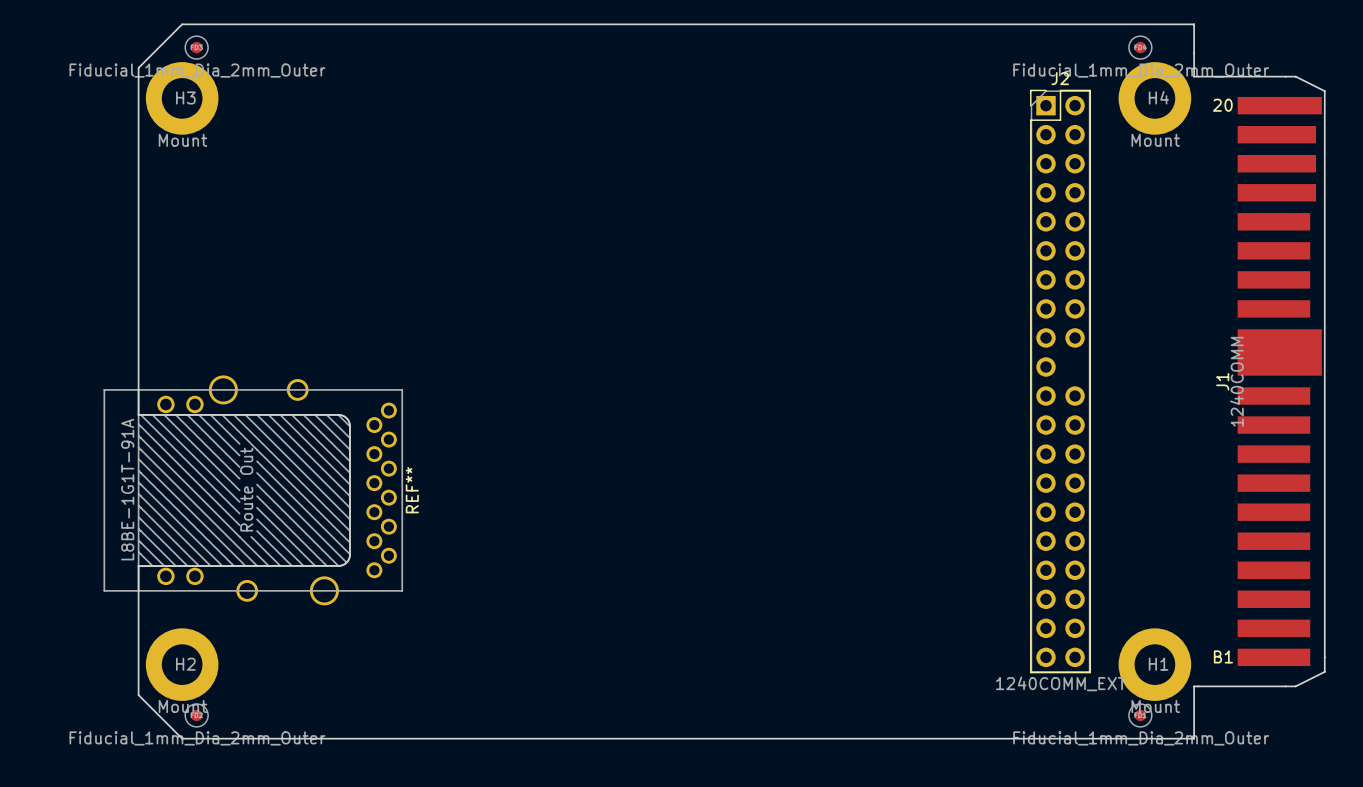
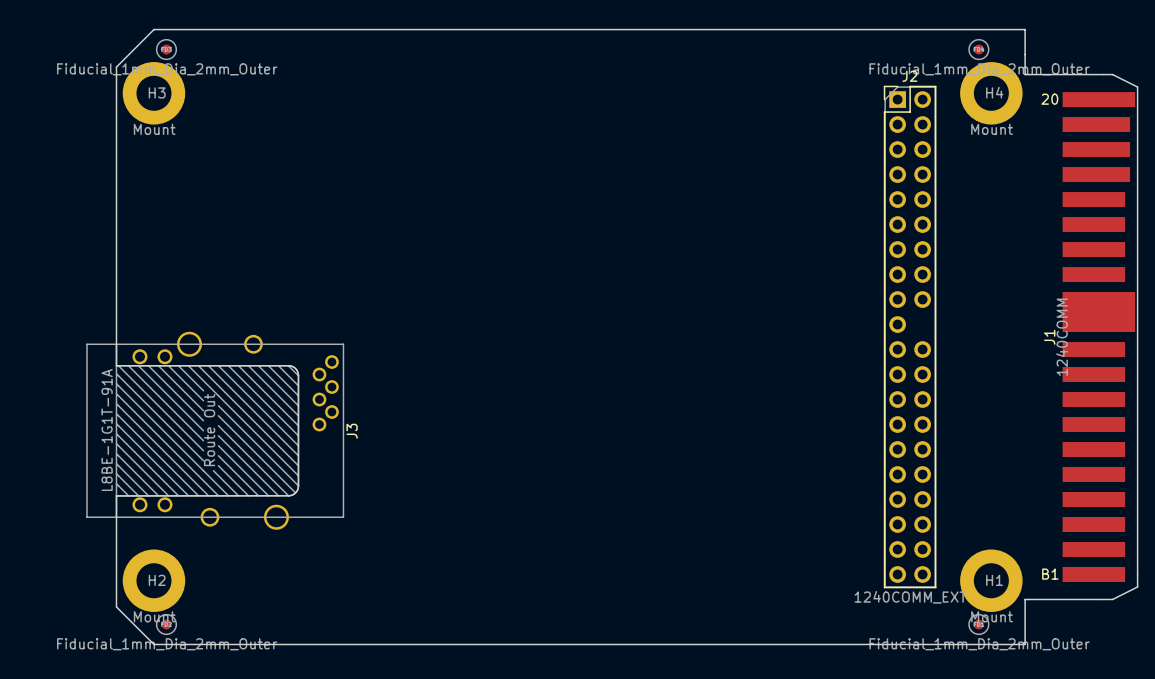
REF**: L8BE-1G1T-91A (253, 490) -> none
J3: none -> L8BE-1G1T-91A (215, 430)

